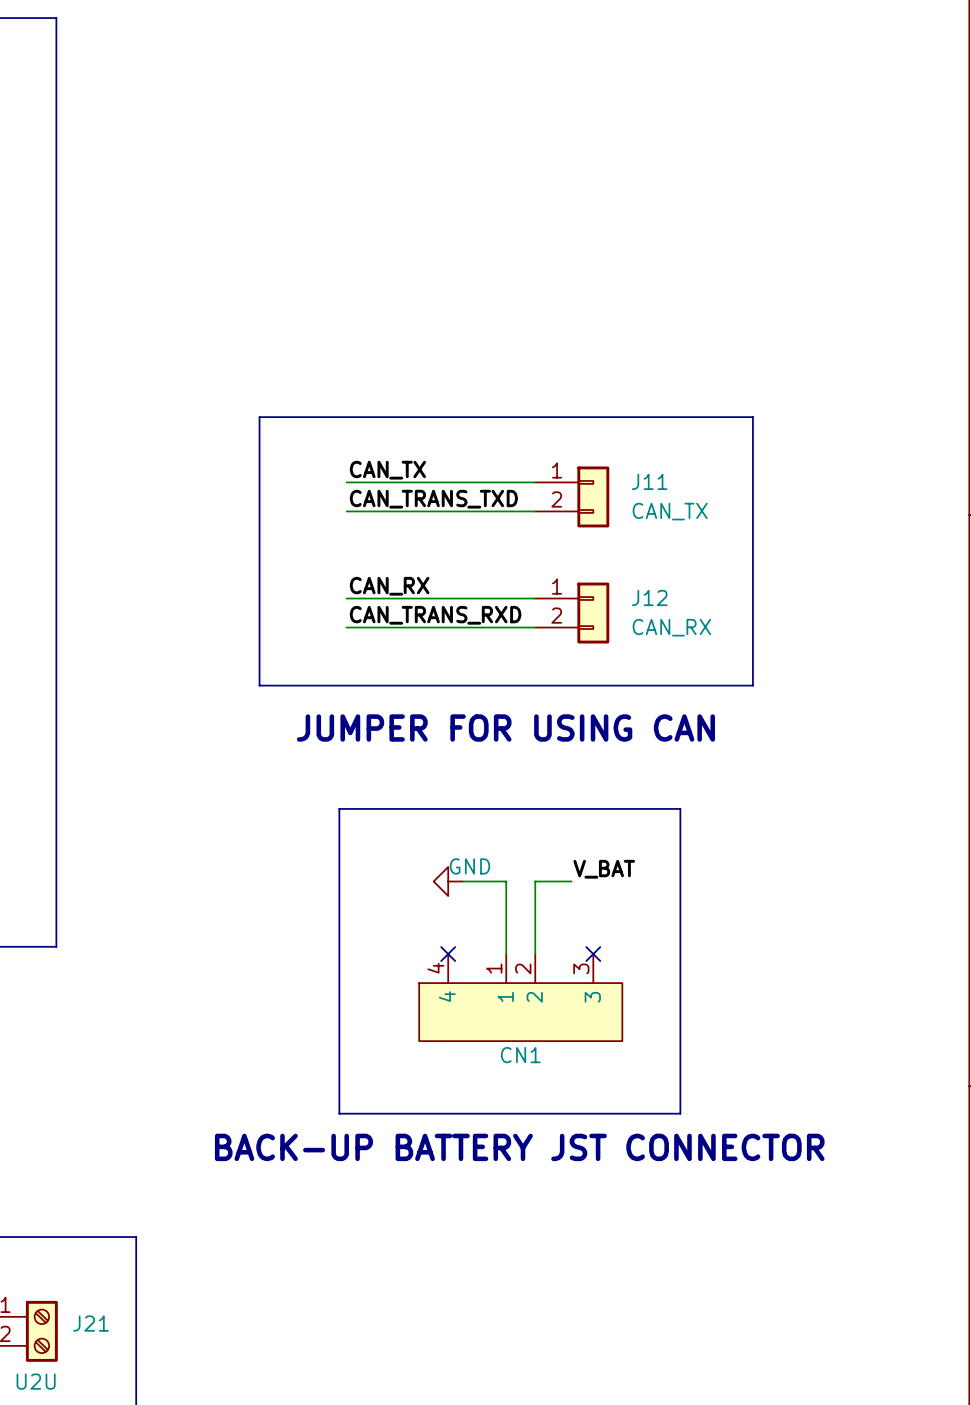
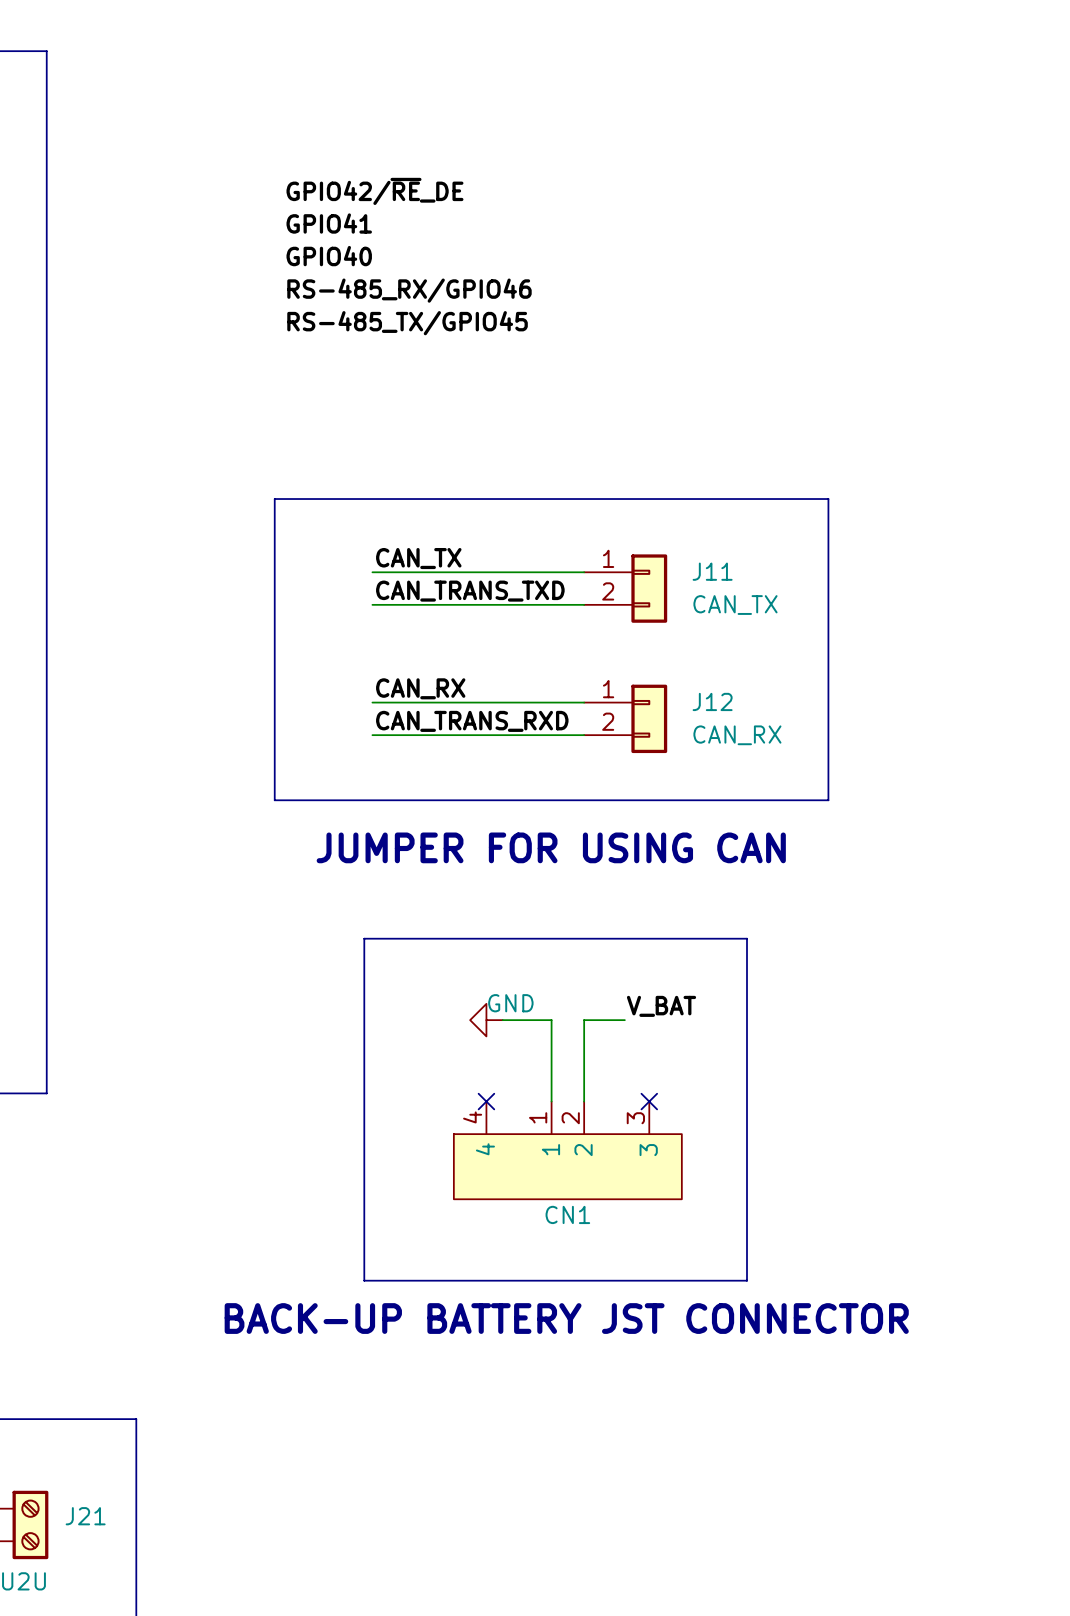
label: none -> GPIO42/~{RE}_DE (374, 191)
label: none -> GPIO41 (329, 223)
label: none -> GPIO40 (329, 256)
label: none -> RS-485_RX/GPIO46 (409, 290)
label: none -> RS-485_TX/GPIO45 (407, 323)

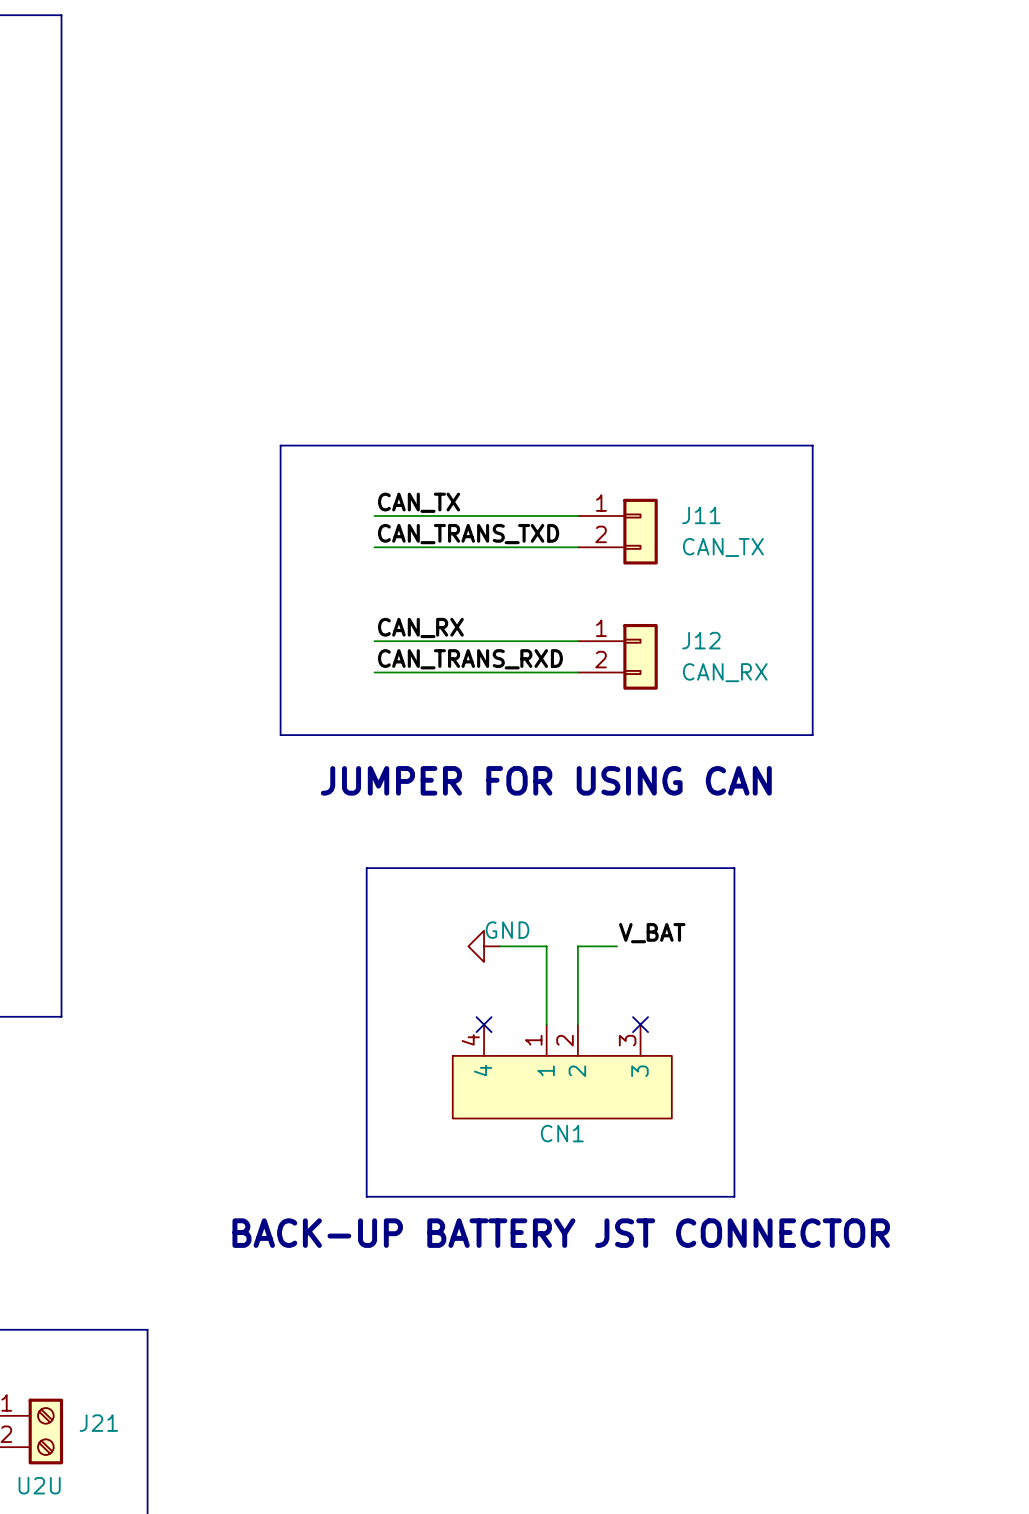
label: GPIO42/~{RE}_DE (374, 191) -> none
label: GPIO41 (329, 223) -> none
label: GPIO40 (329, 256) -> none
label: RS-485_RX/GPIO46 (409, 290) -> none
label: RS-485_TX/GPIO45 (407, 323) -> none

